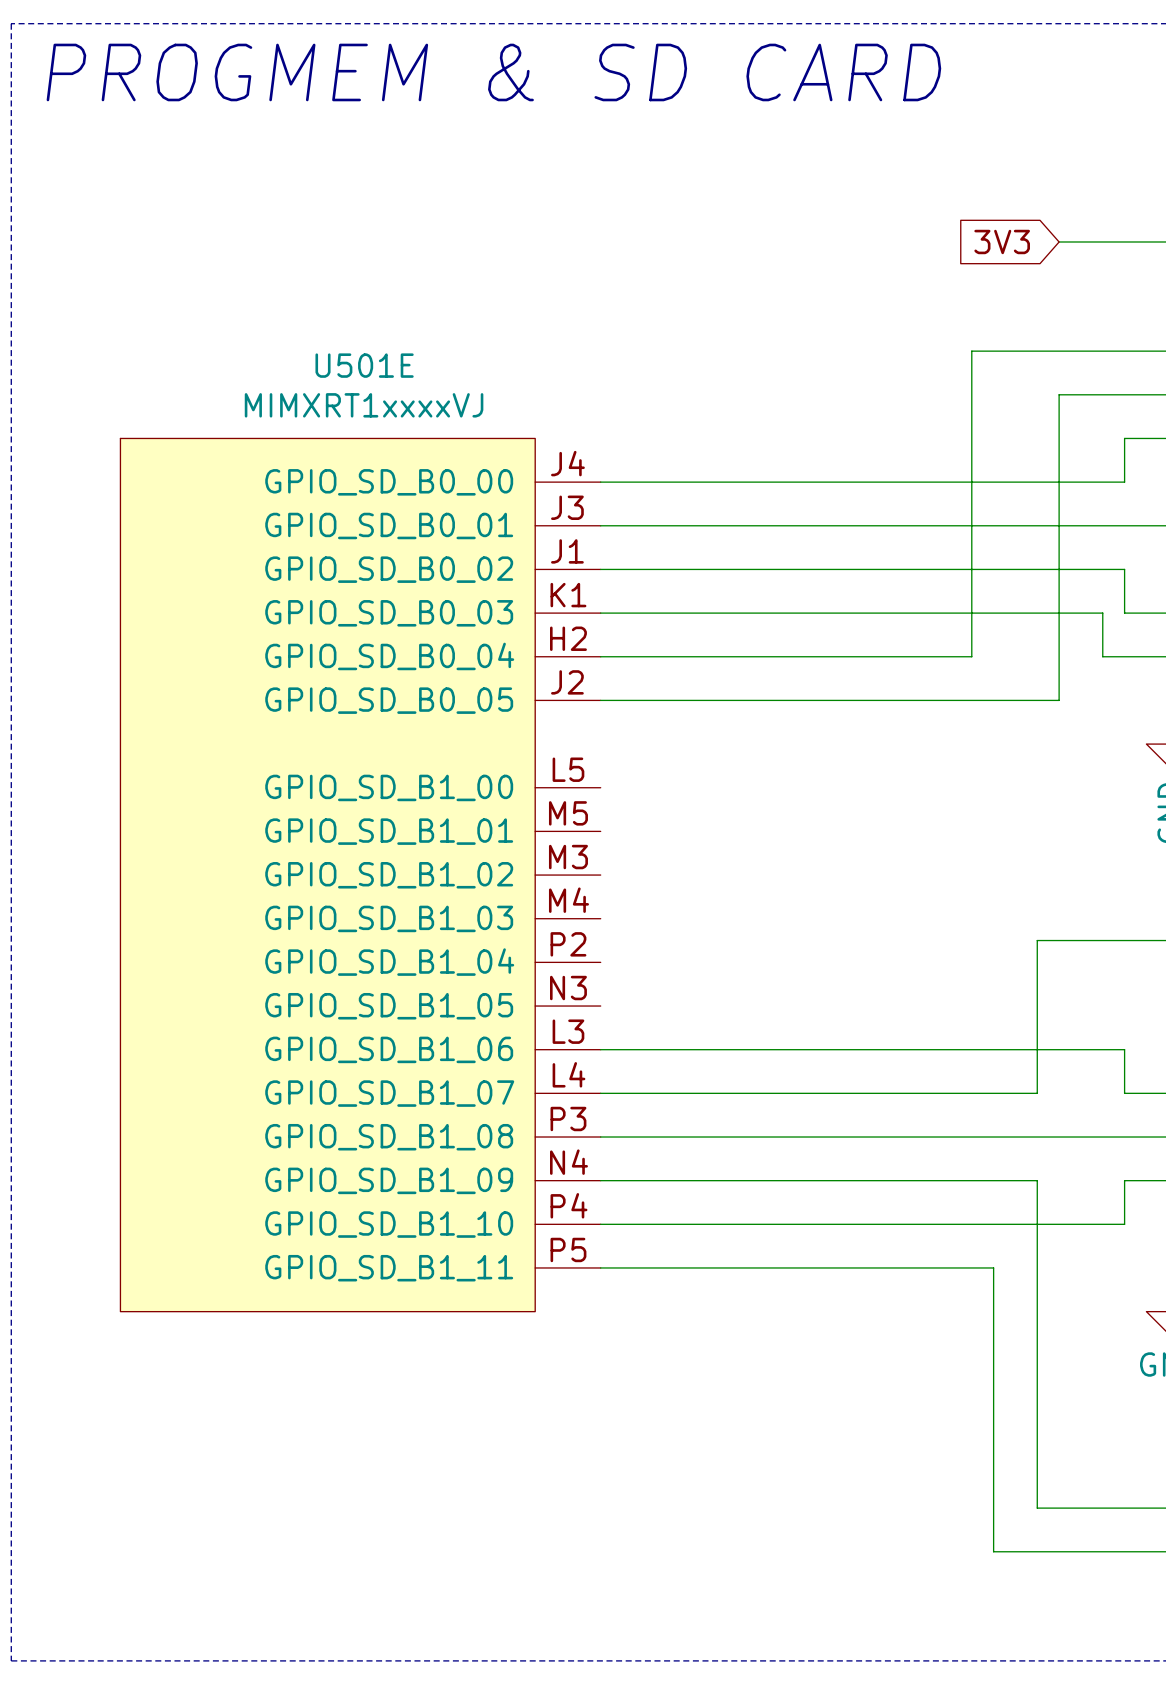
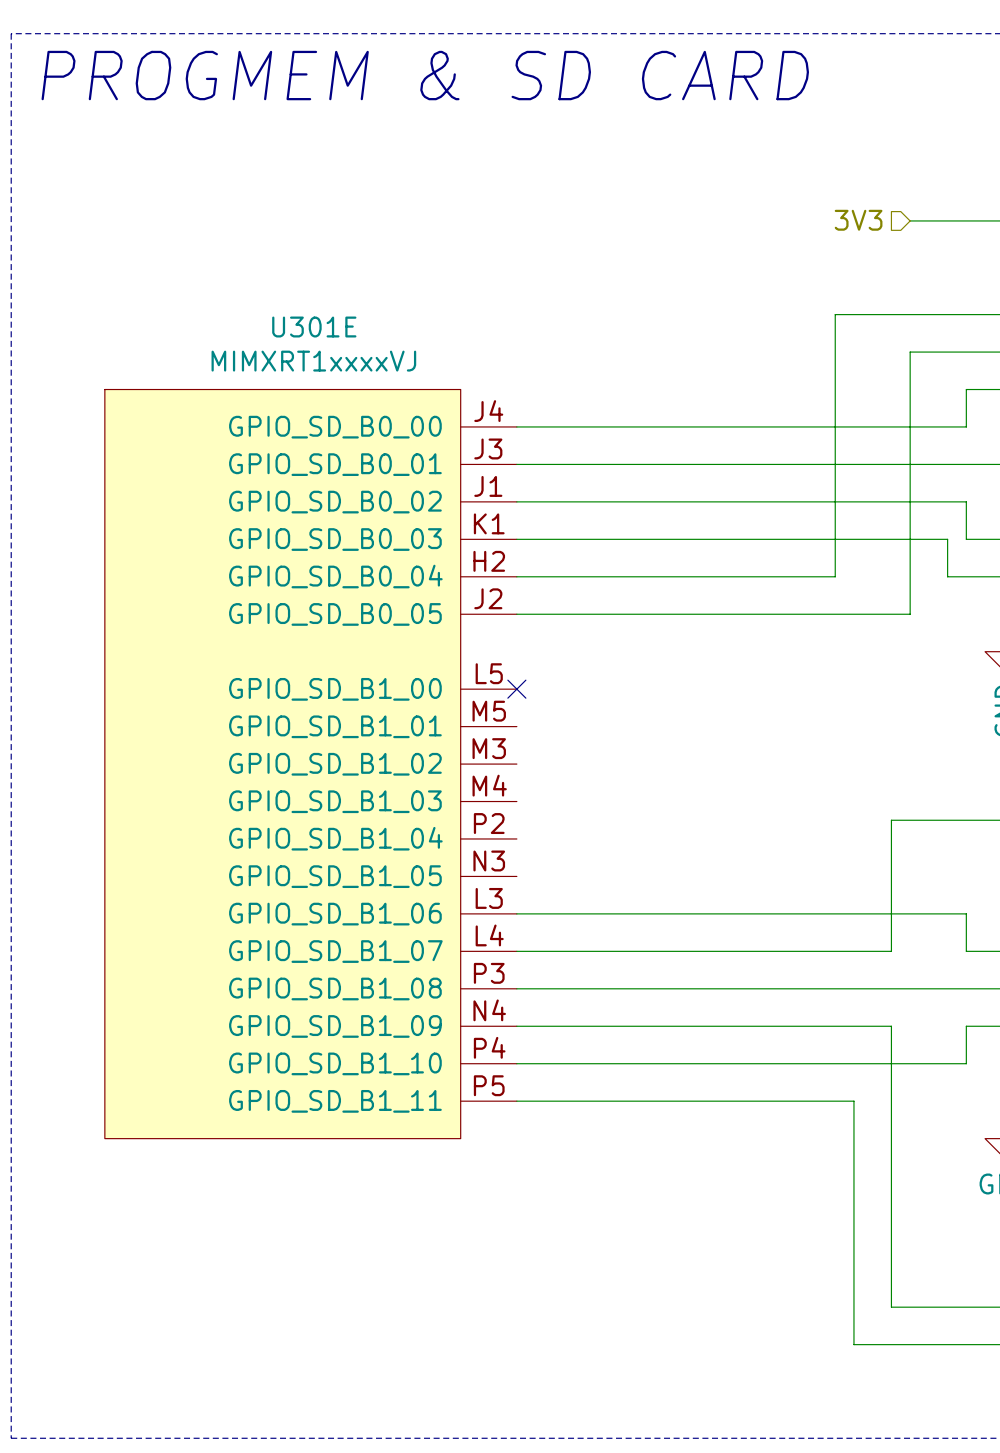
hierarchical label: none -> 3V3 (858, 220)
global label: 3V3 (1002, 241) -> none
U501E name: U501E (364, 365) -> U301E (314, 327)
no-connect mark: none -> (516, 689)

